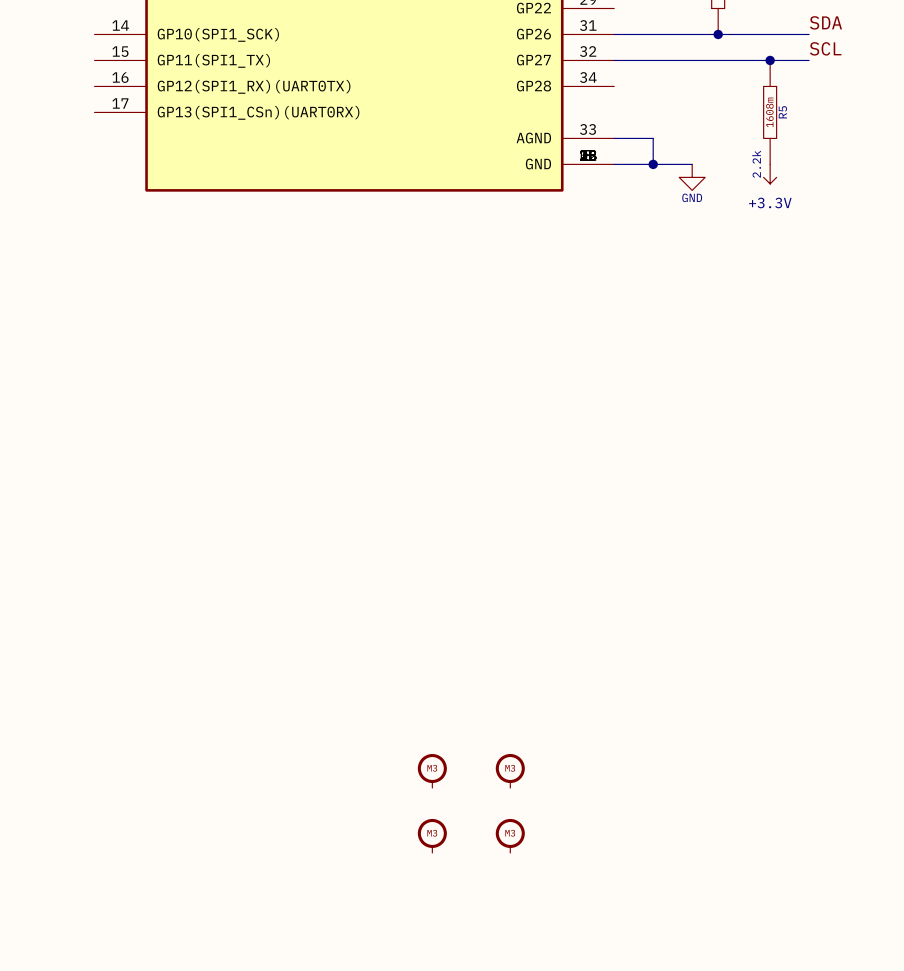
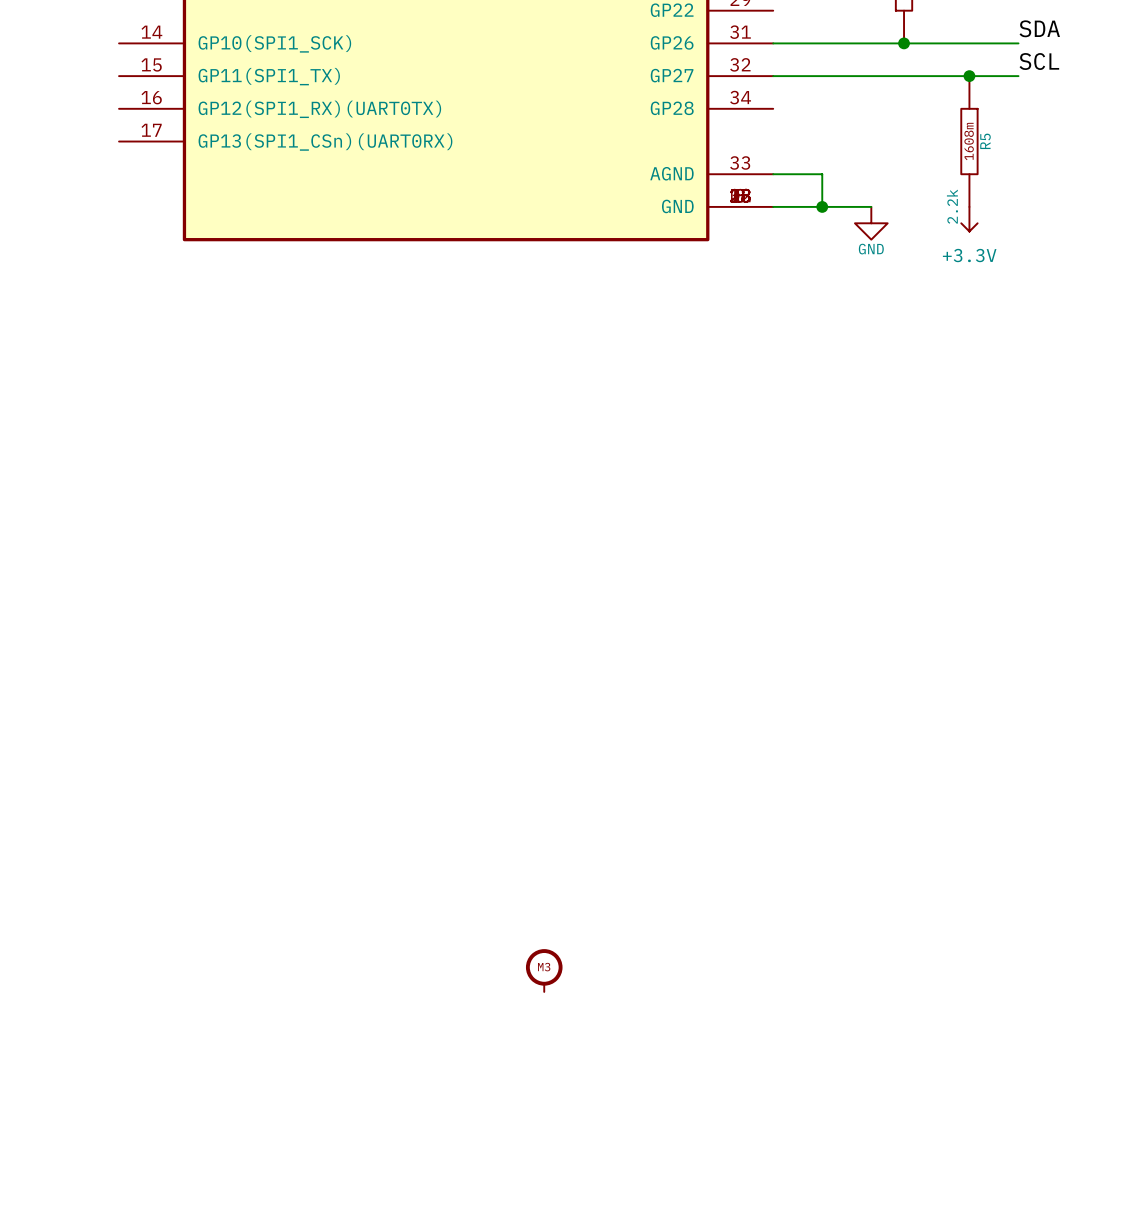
part: (510, 770) -> none
part: (432, 835) -> none
part: (510, 835) -> none

